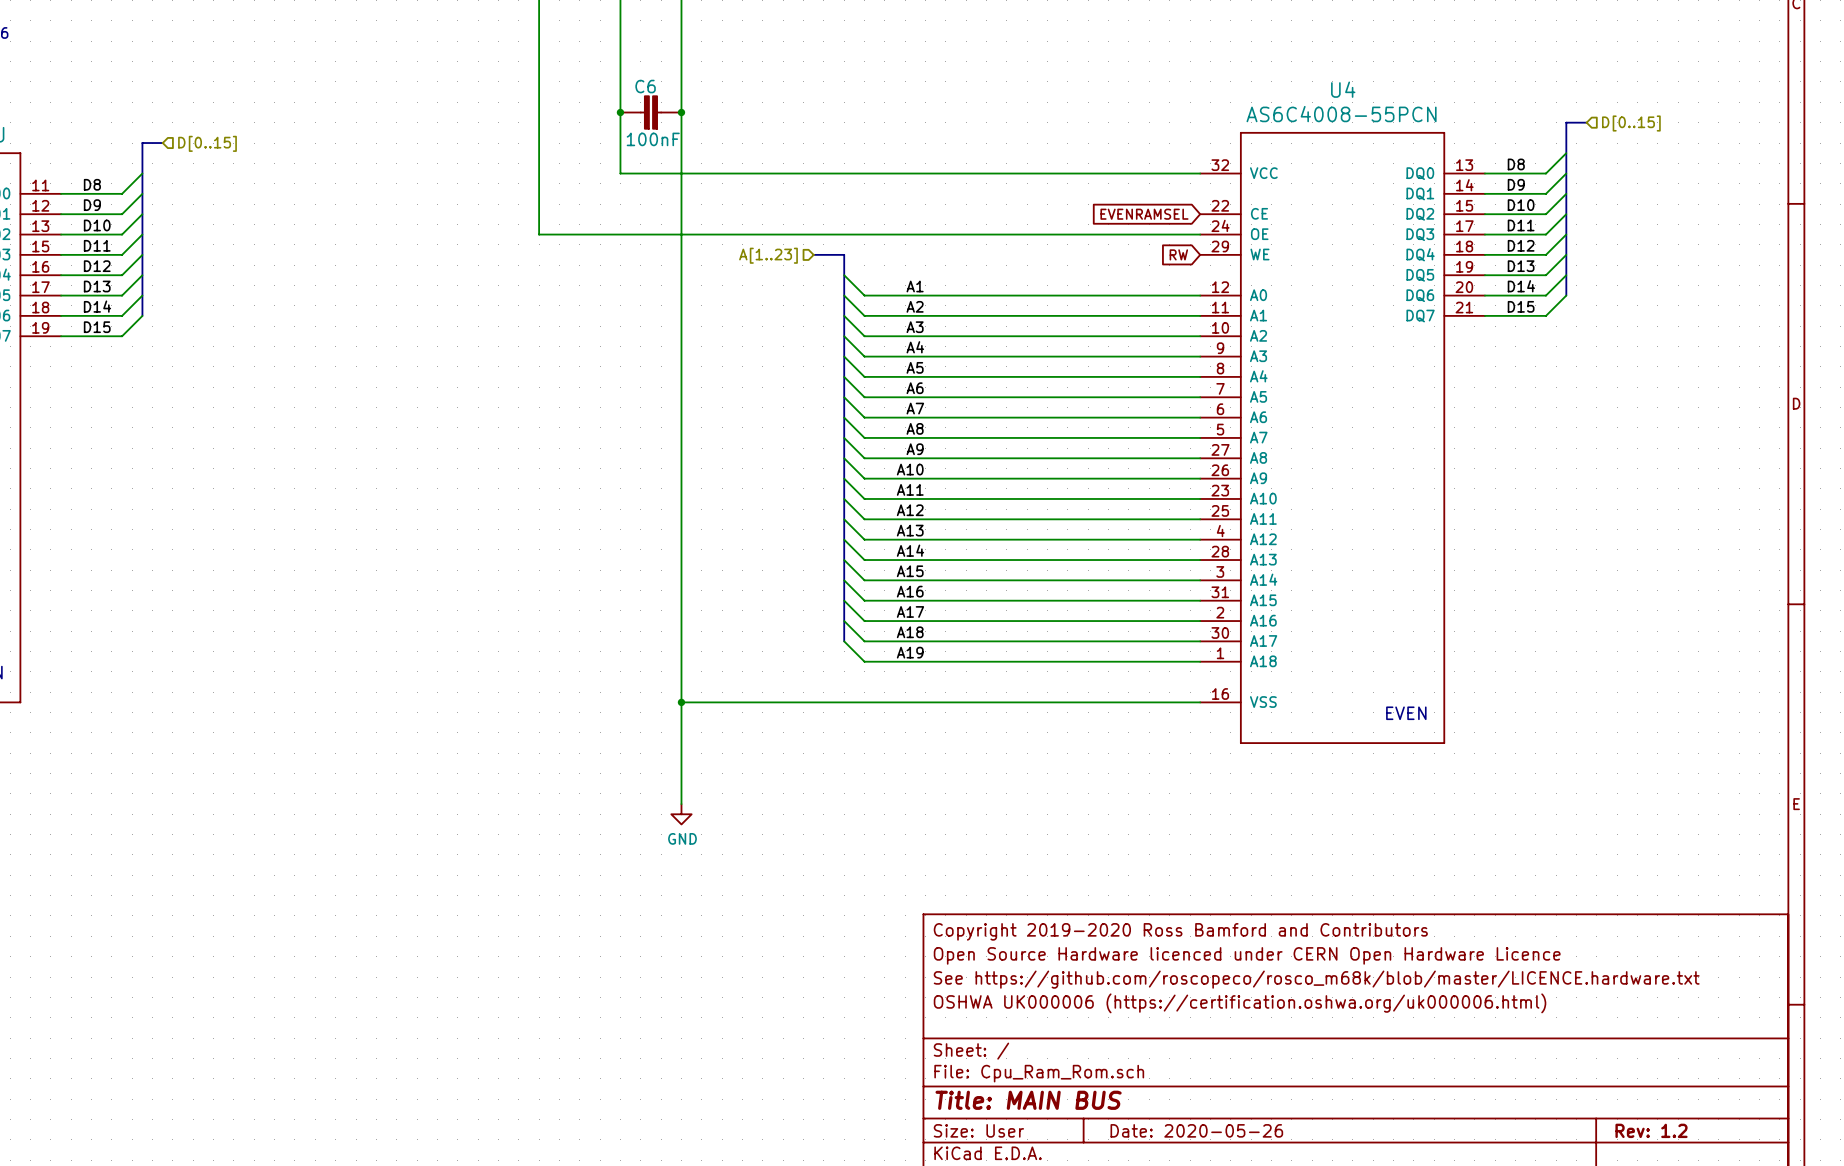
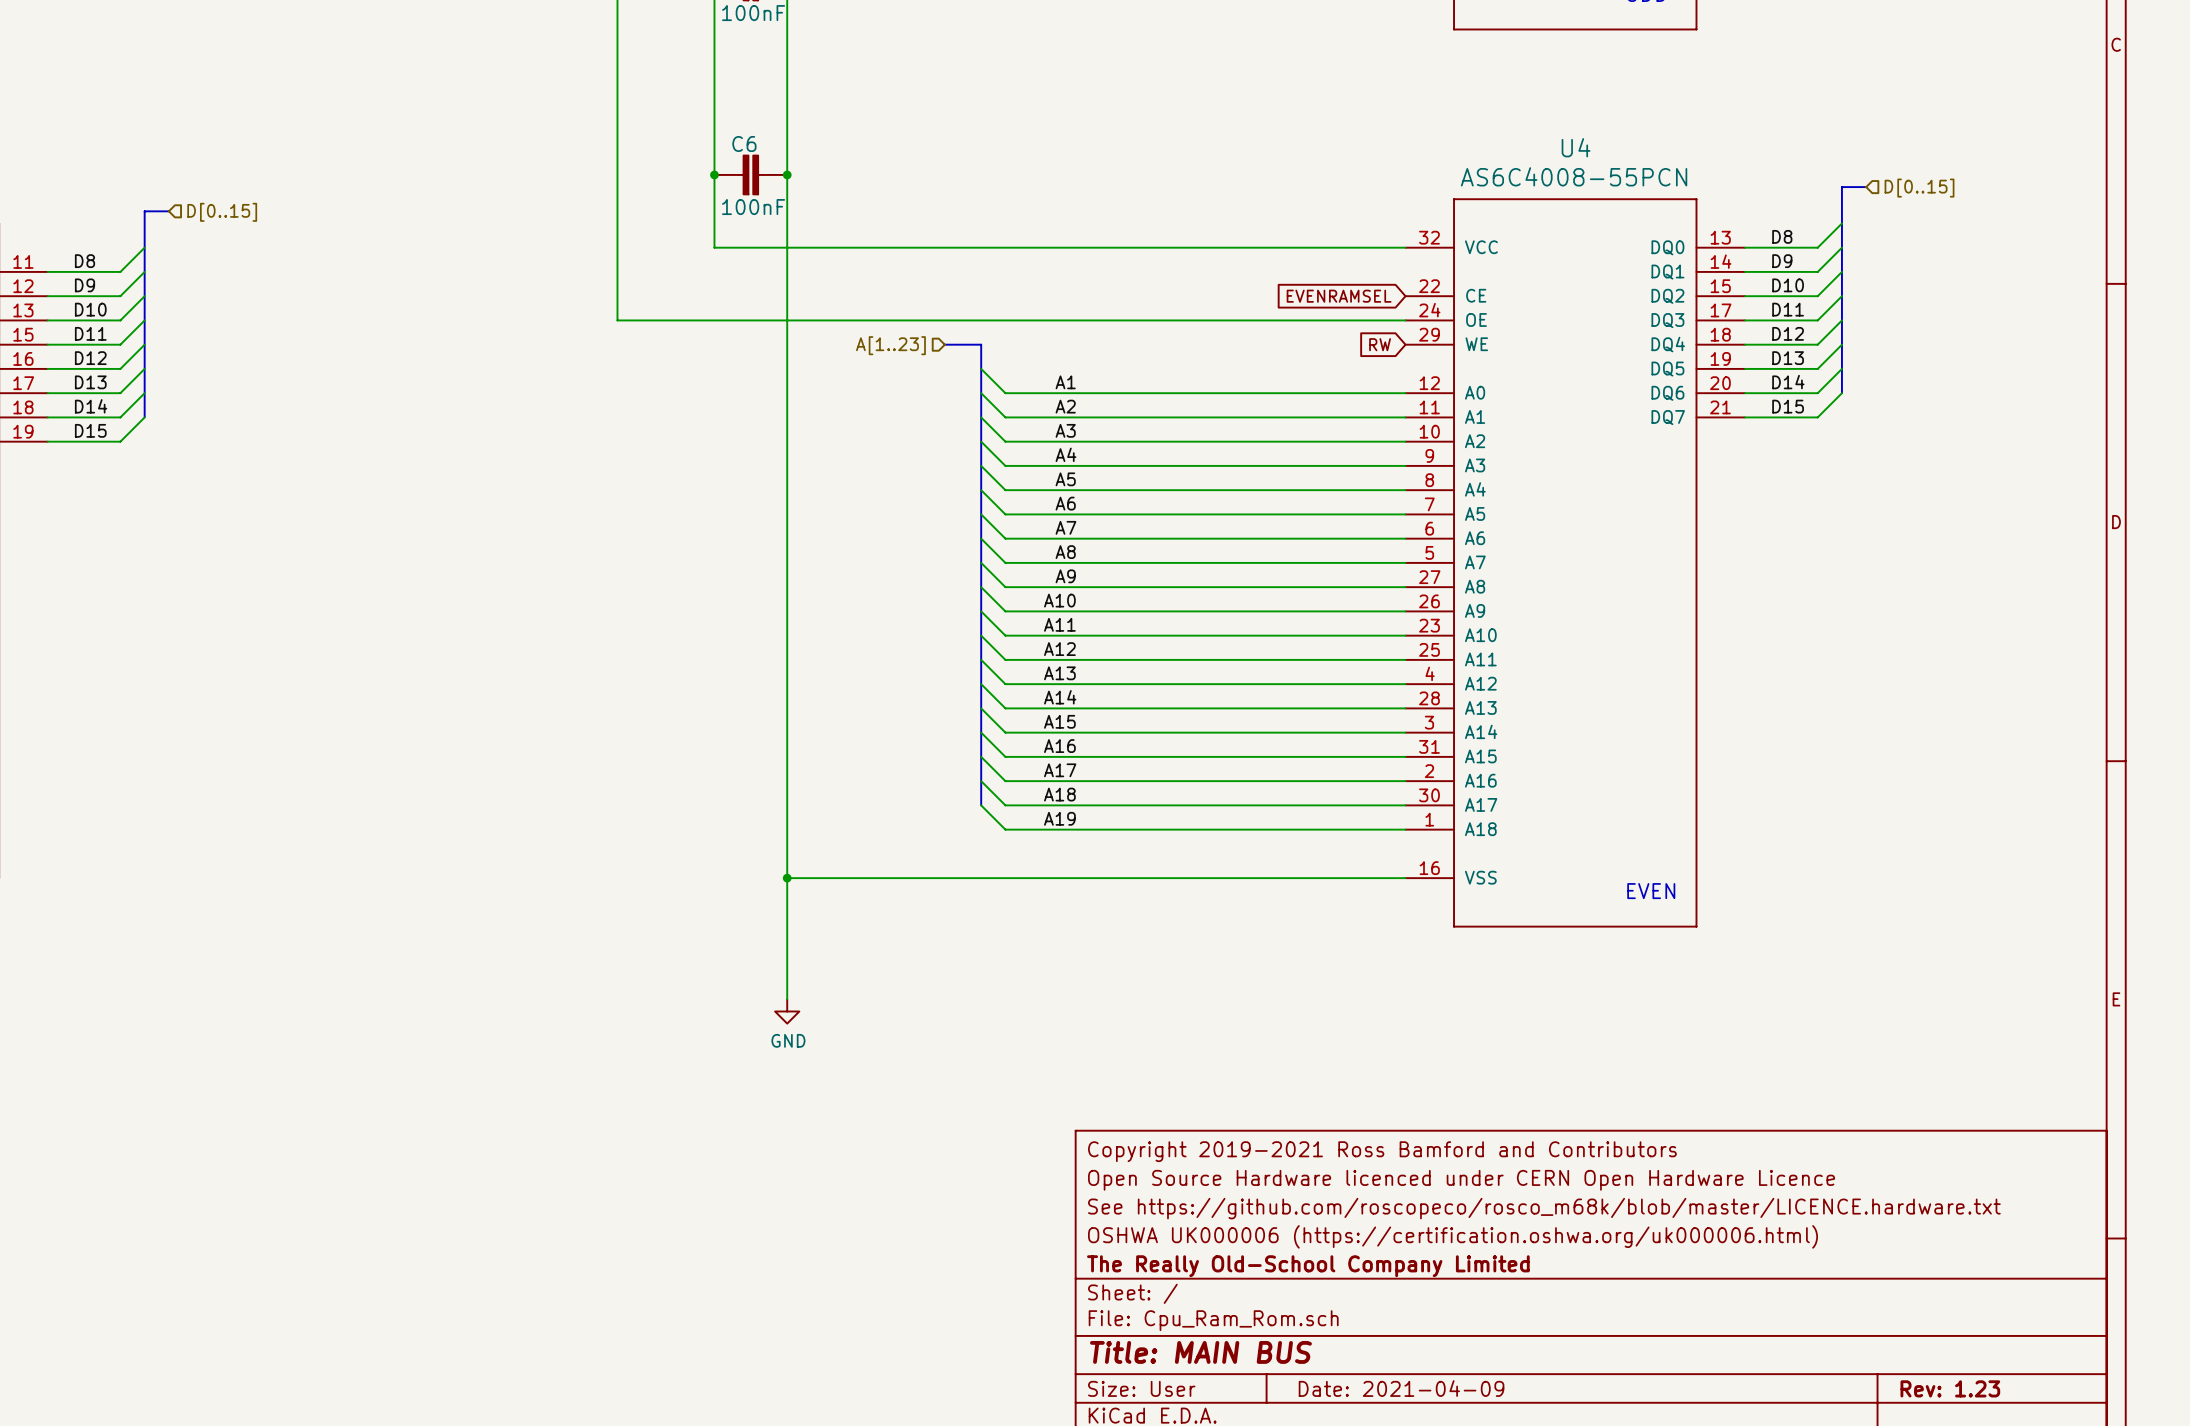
title block: Copyright 2019-2020 Ross Bamford and Contributors (1180, 931) -> Copyright 2019-2021 Ross Bamford and Contributors (1382, 1151)
title block: none -> The Really Old-School Company Limited (1308, 1266)
title block: Date: 2020-05-26 (1196, 1130) -> Date: 2021-04-09 (1401, 1388)
title block: Rev: 1.2 (1651, 1130) -> Rev: 1.23 (1950, 1388)

